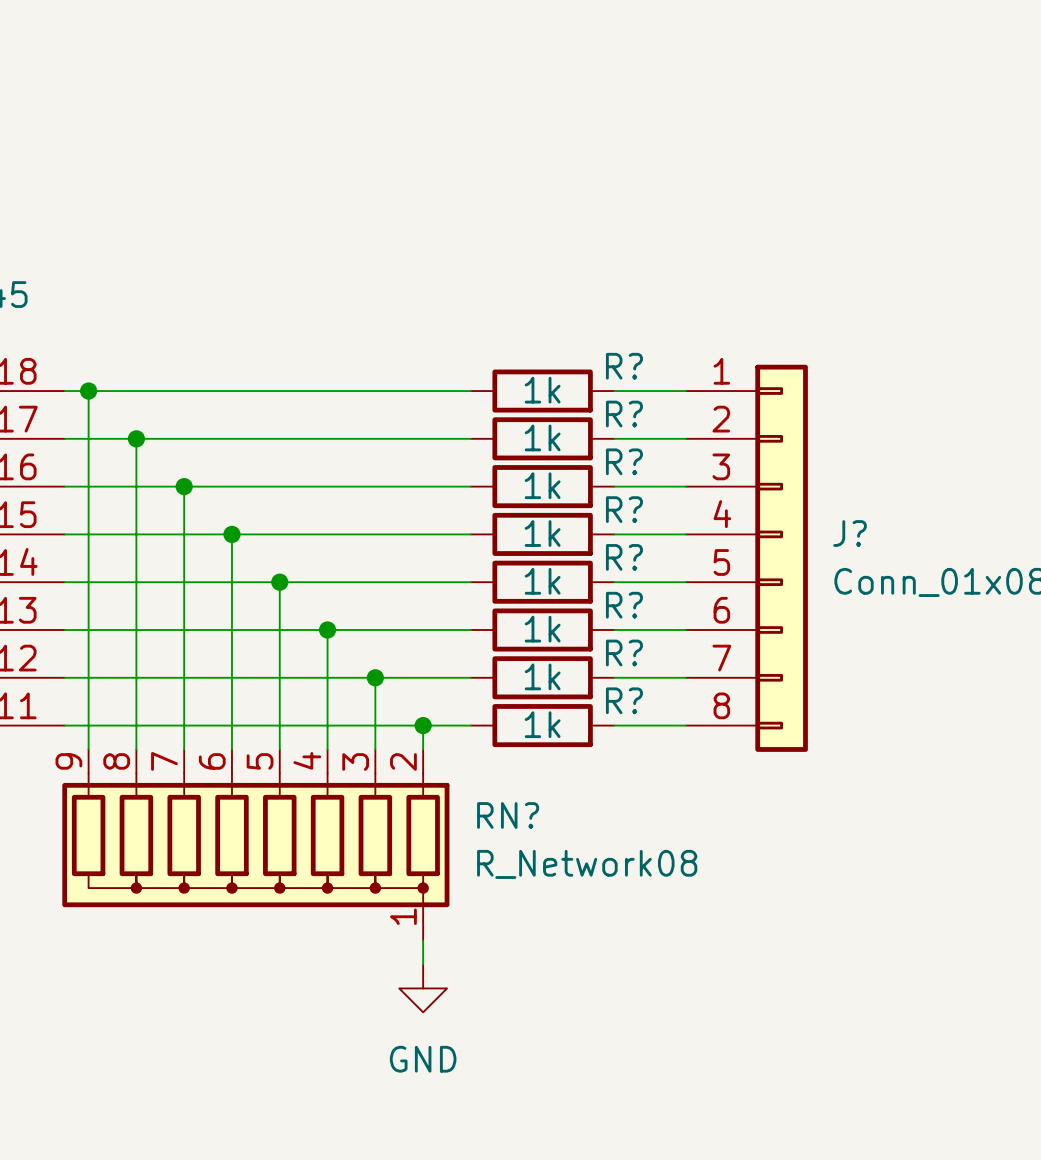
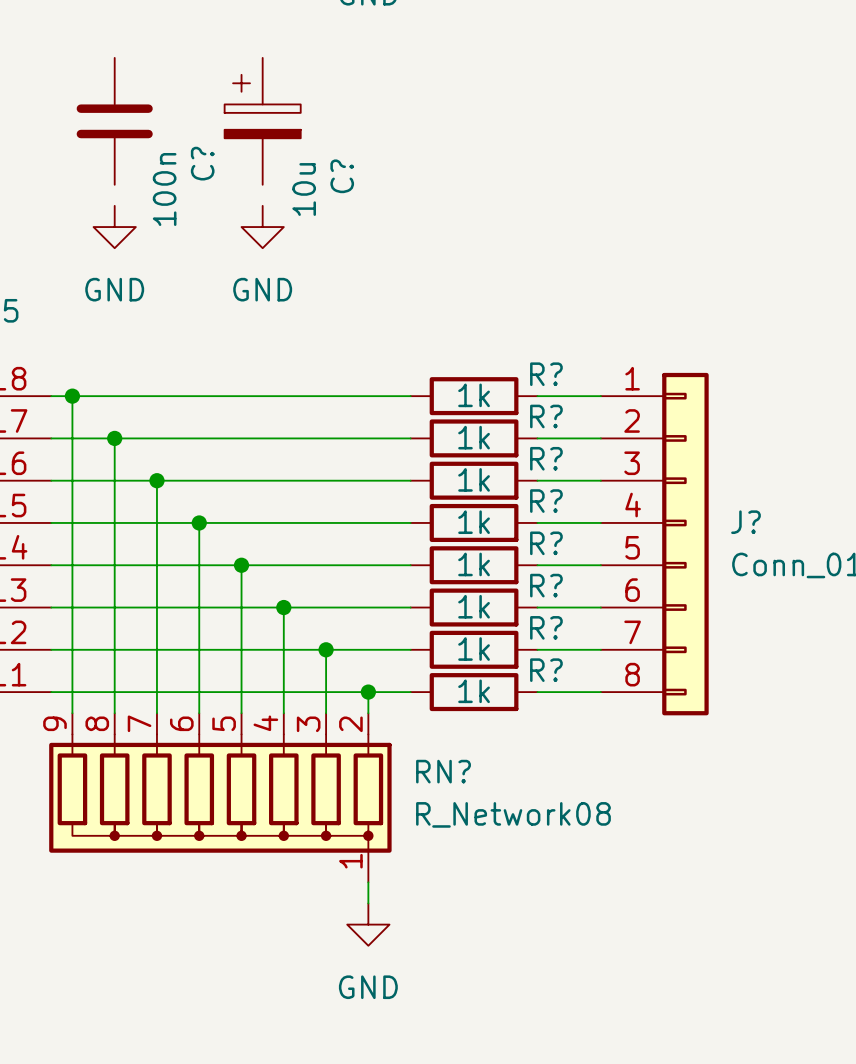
C?: none -> 100n (114, 121)
C?: none -> 10u (262, 121)
power symbol: none -> GND (114, 227)
power symbol: none -> GND (262, 227)

